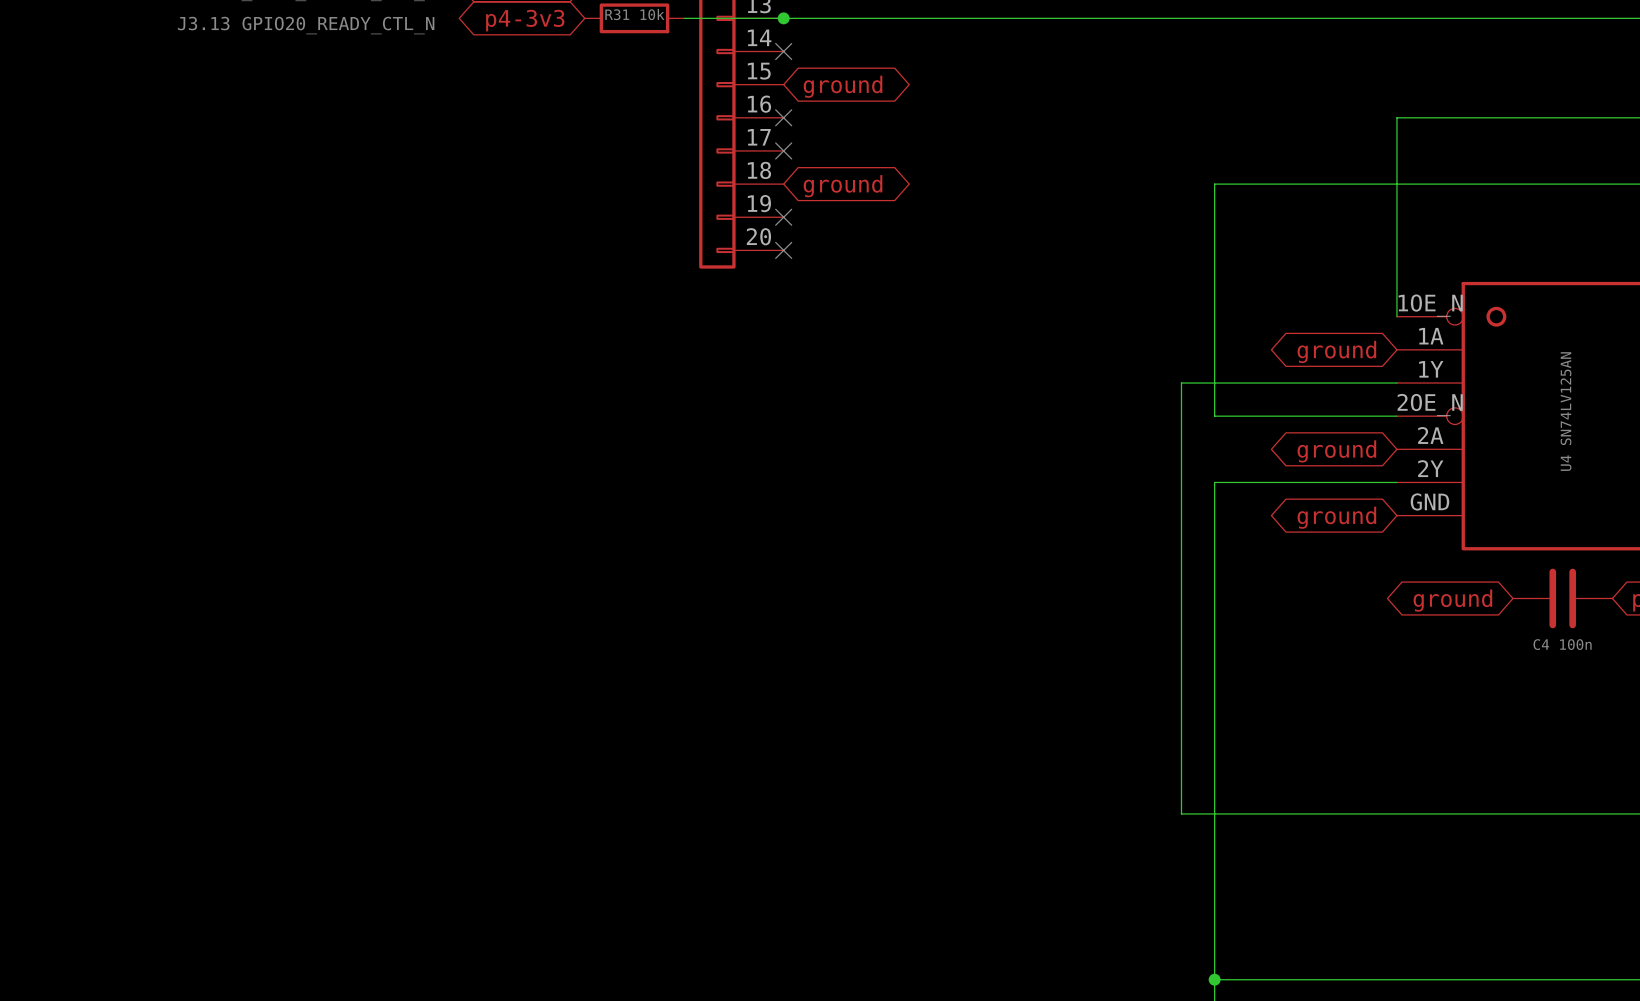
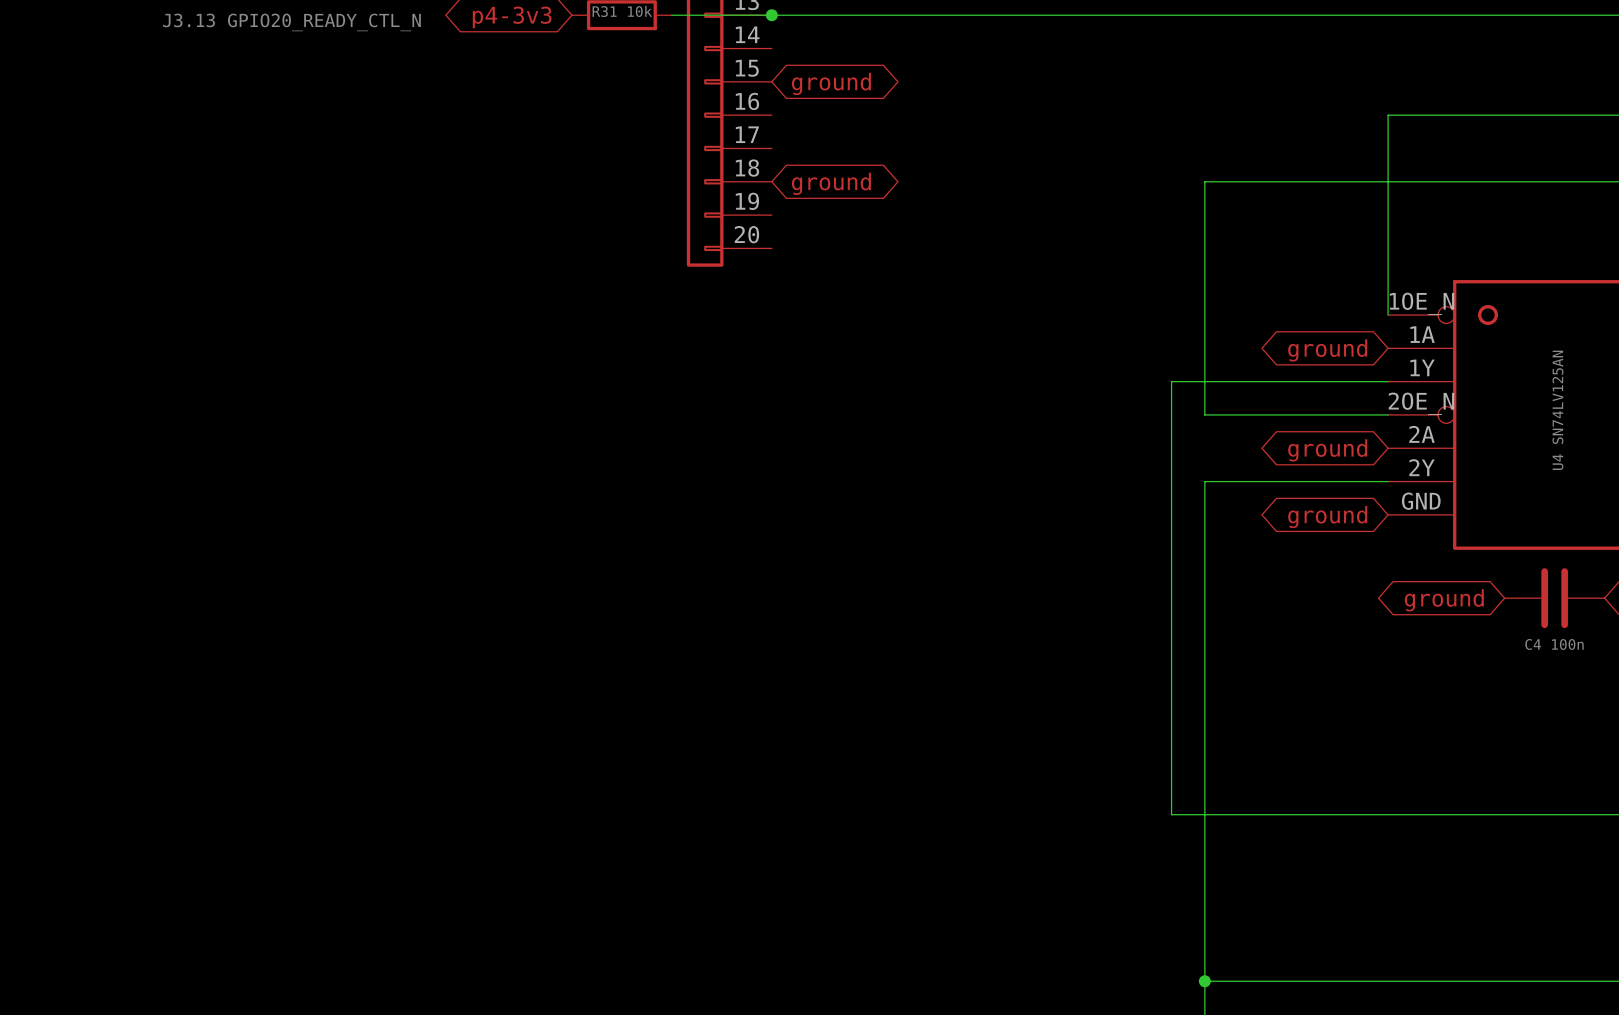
no-connect mark: (783, 51) -> none
no-connect mark: (783, 117) -> none
no-connect mark: (783, 150) -> none
no-connect mark: (783, 217) -> none
no-connect mark: (783, 250) -> none

